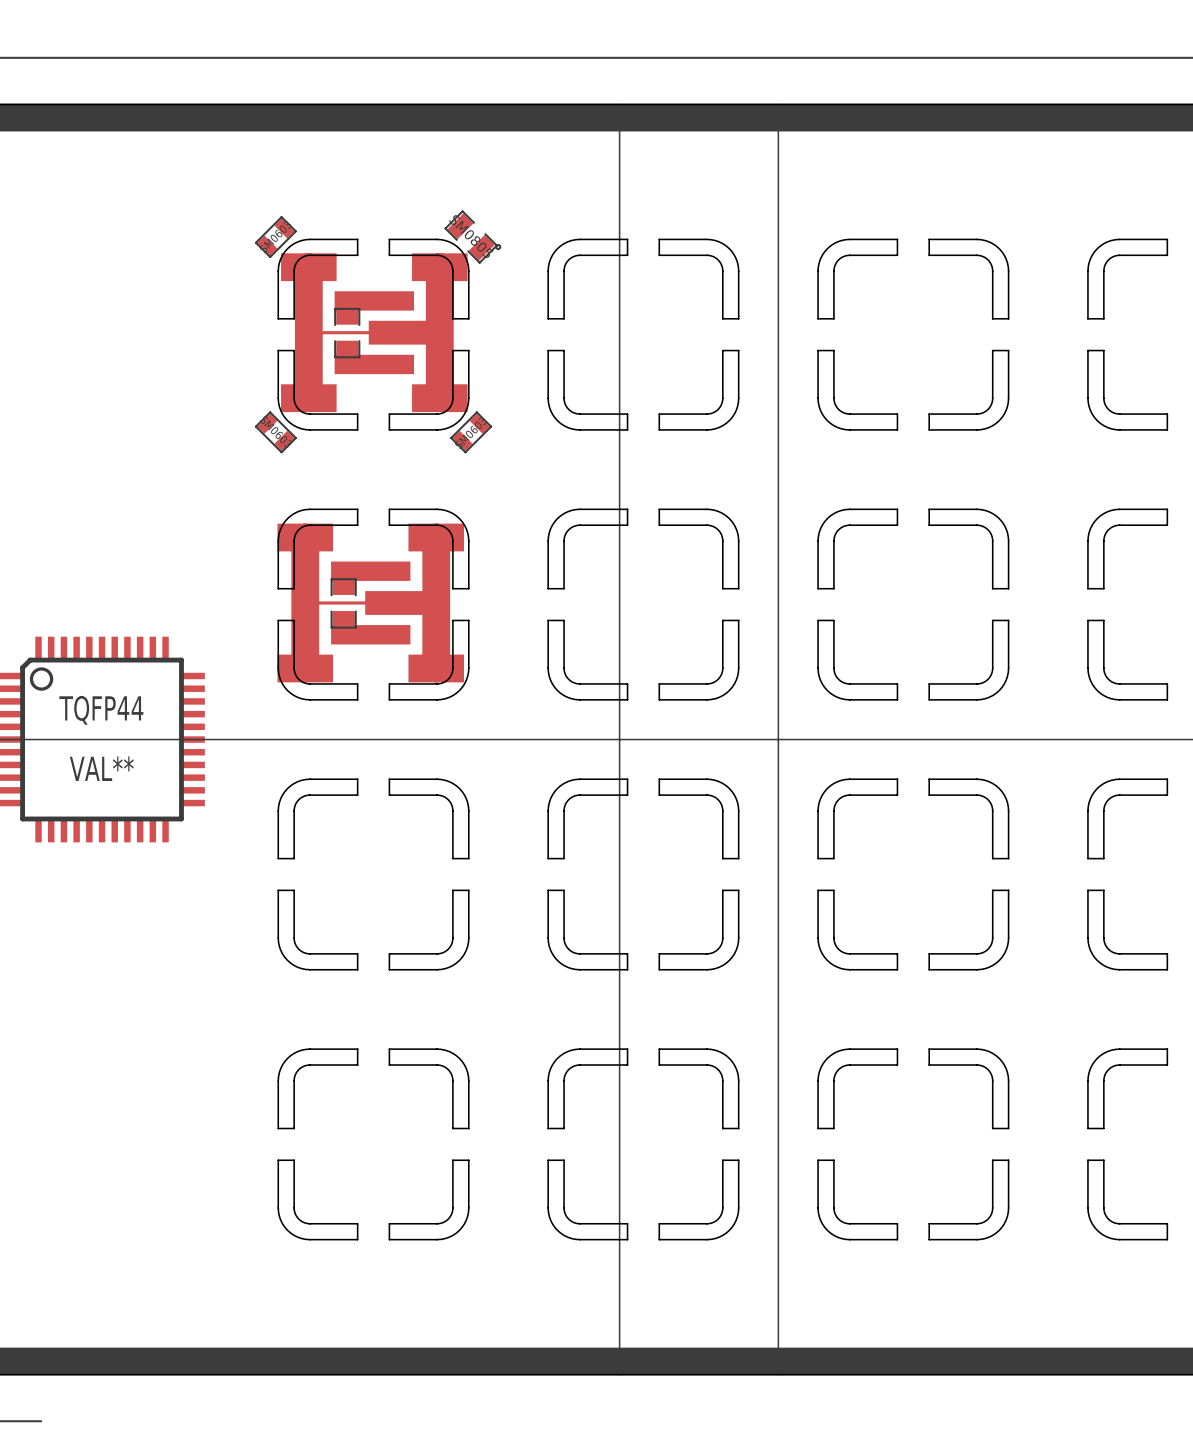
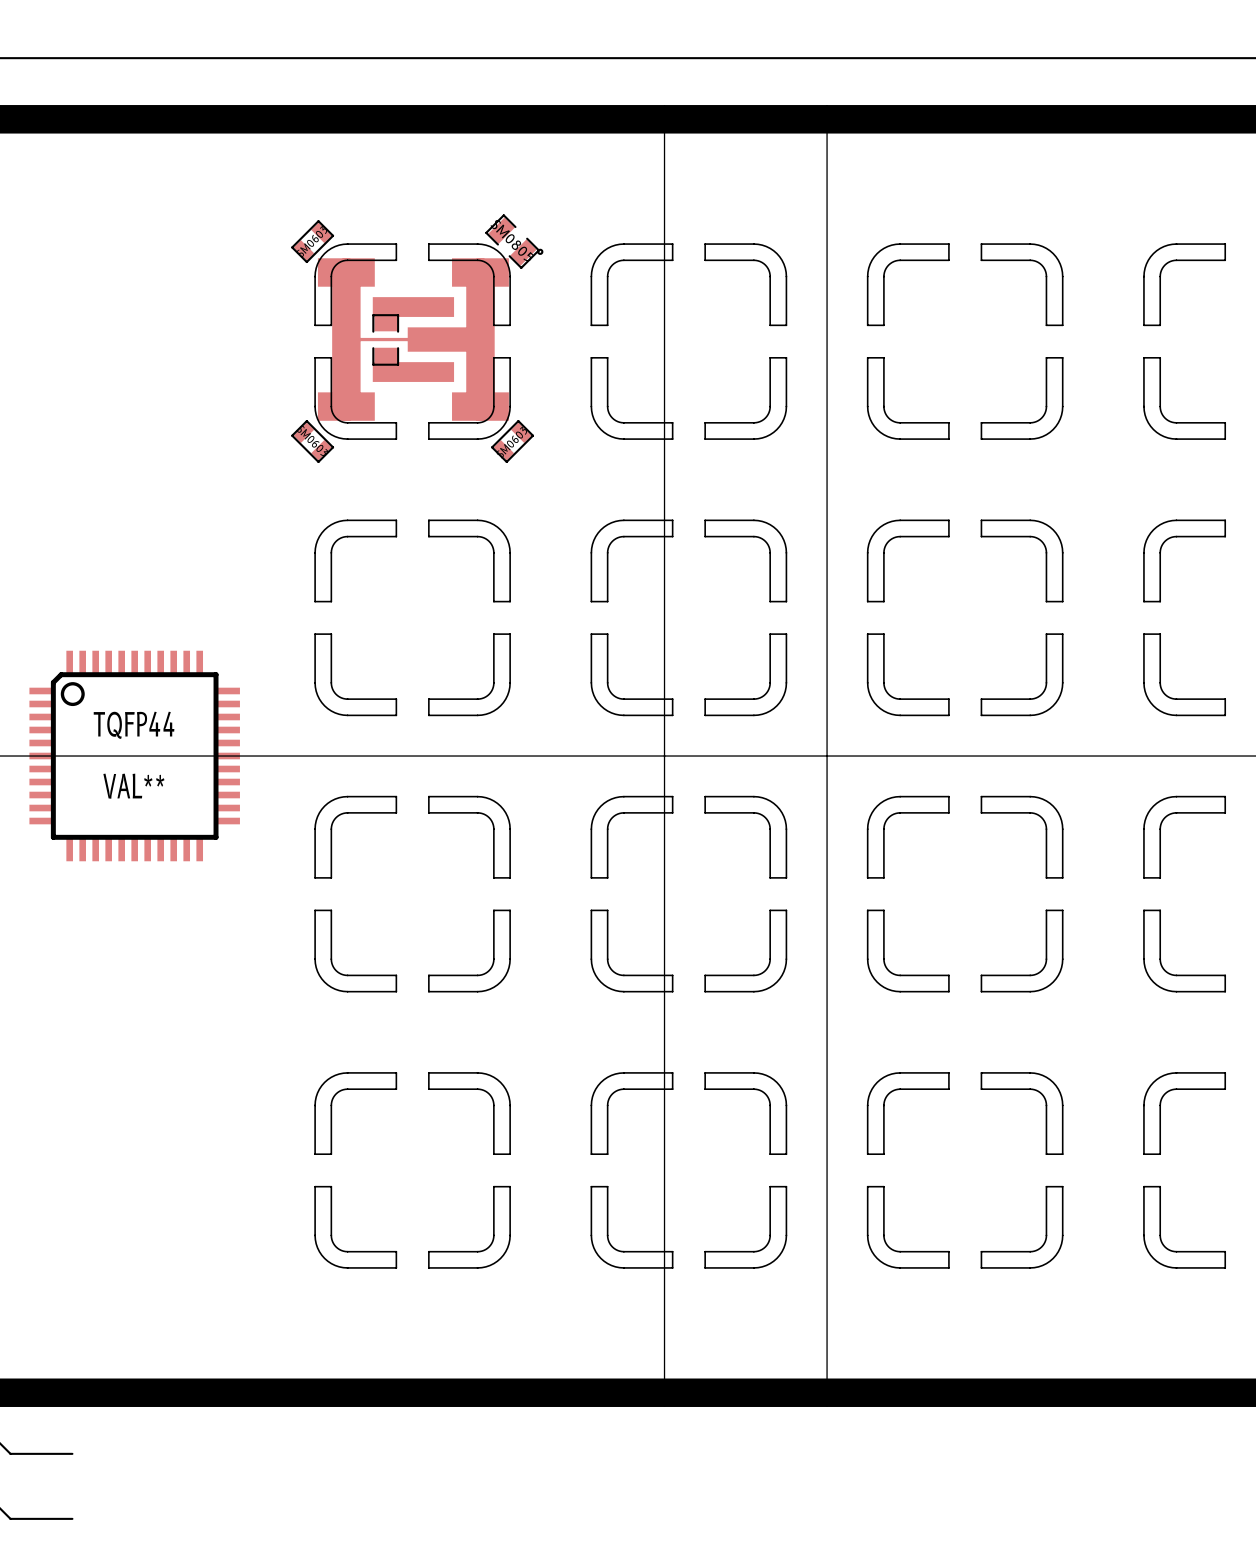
part: (370, 602) -> none

